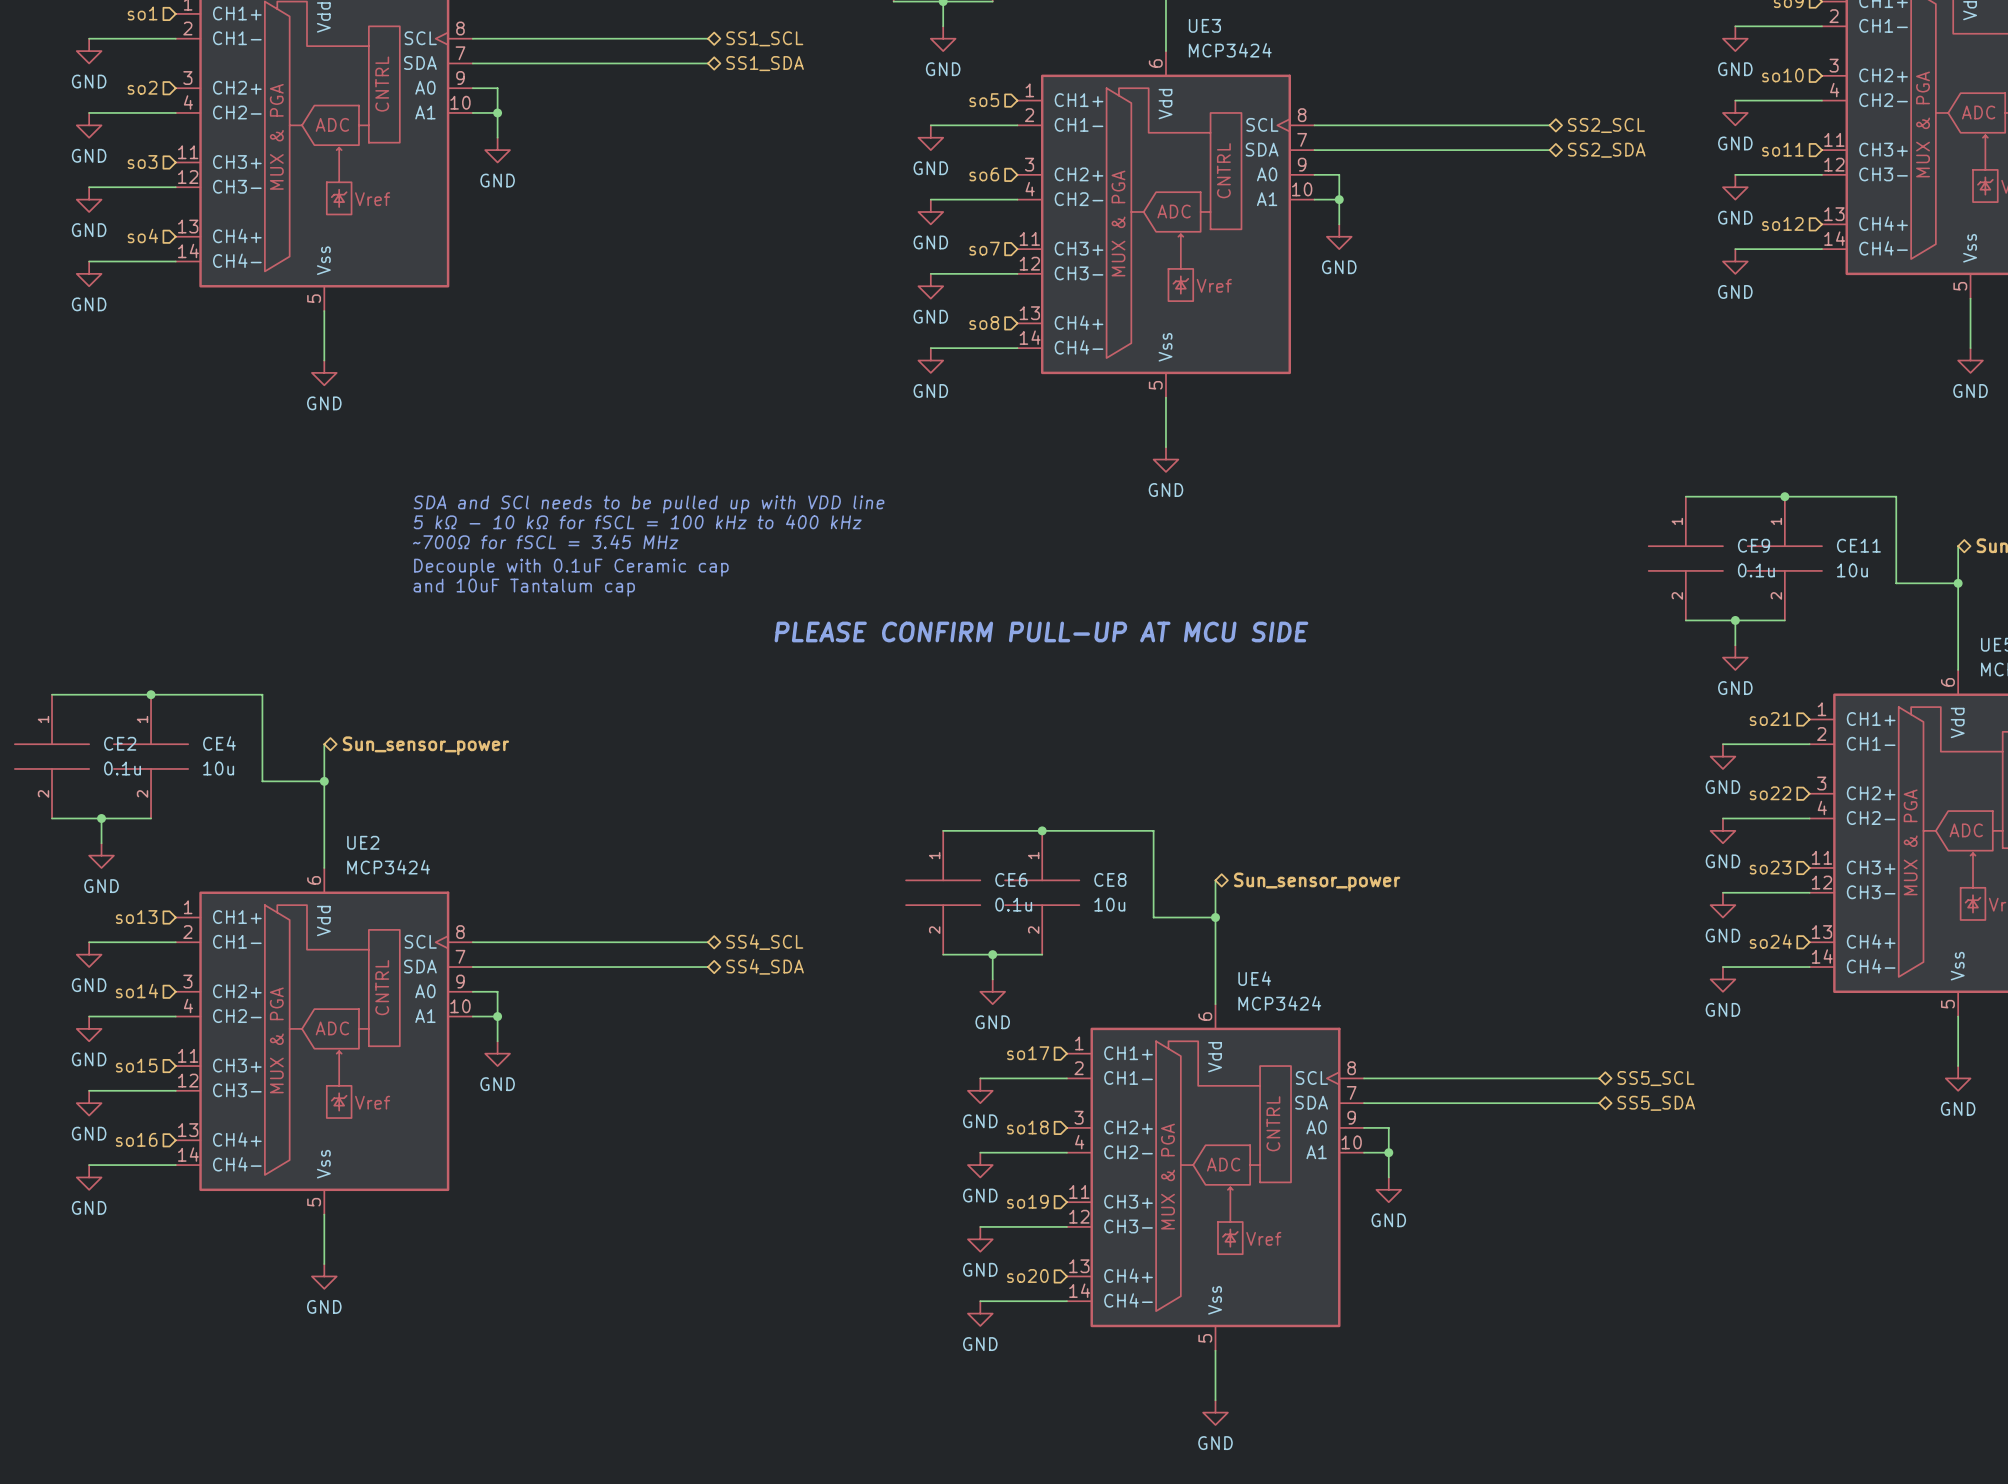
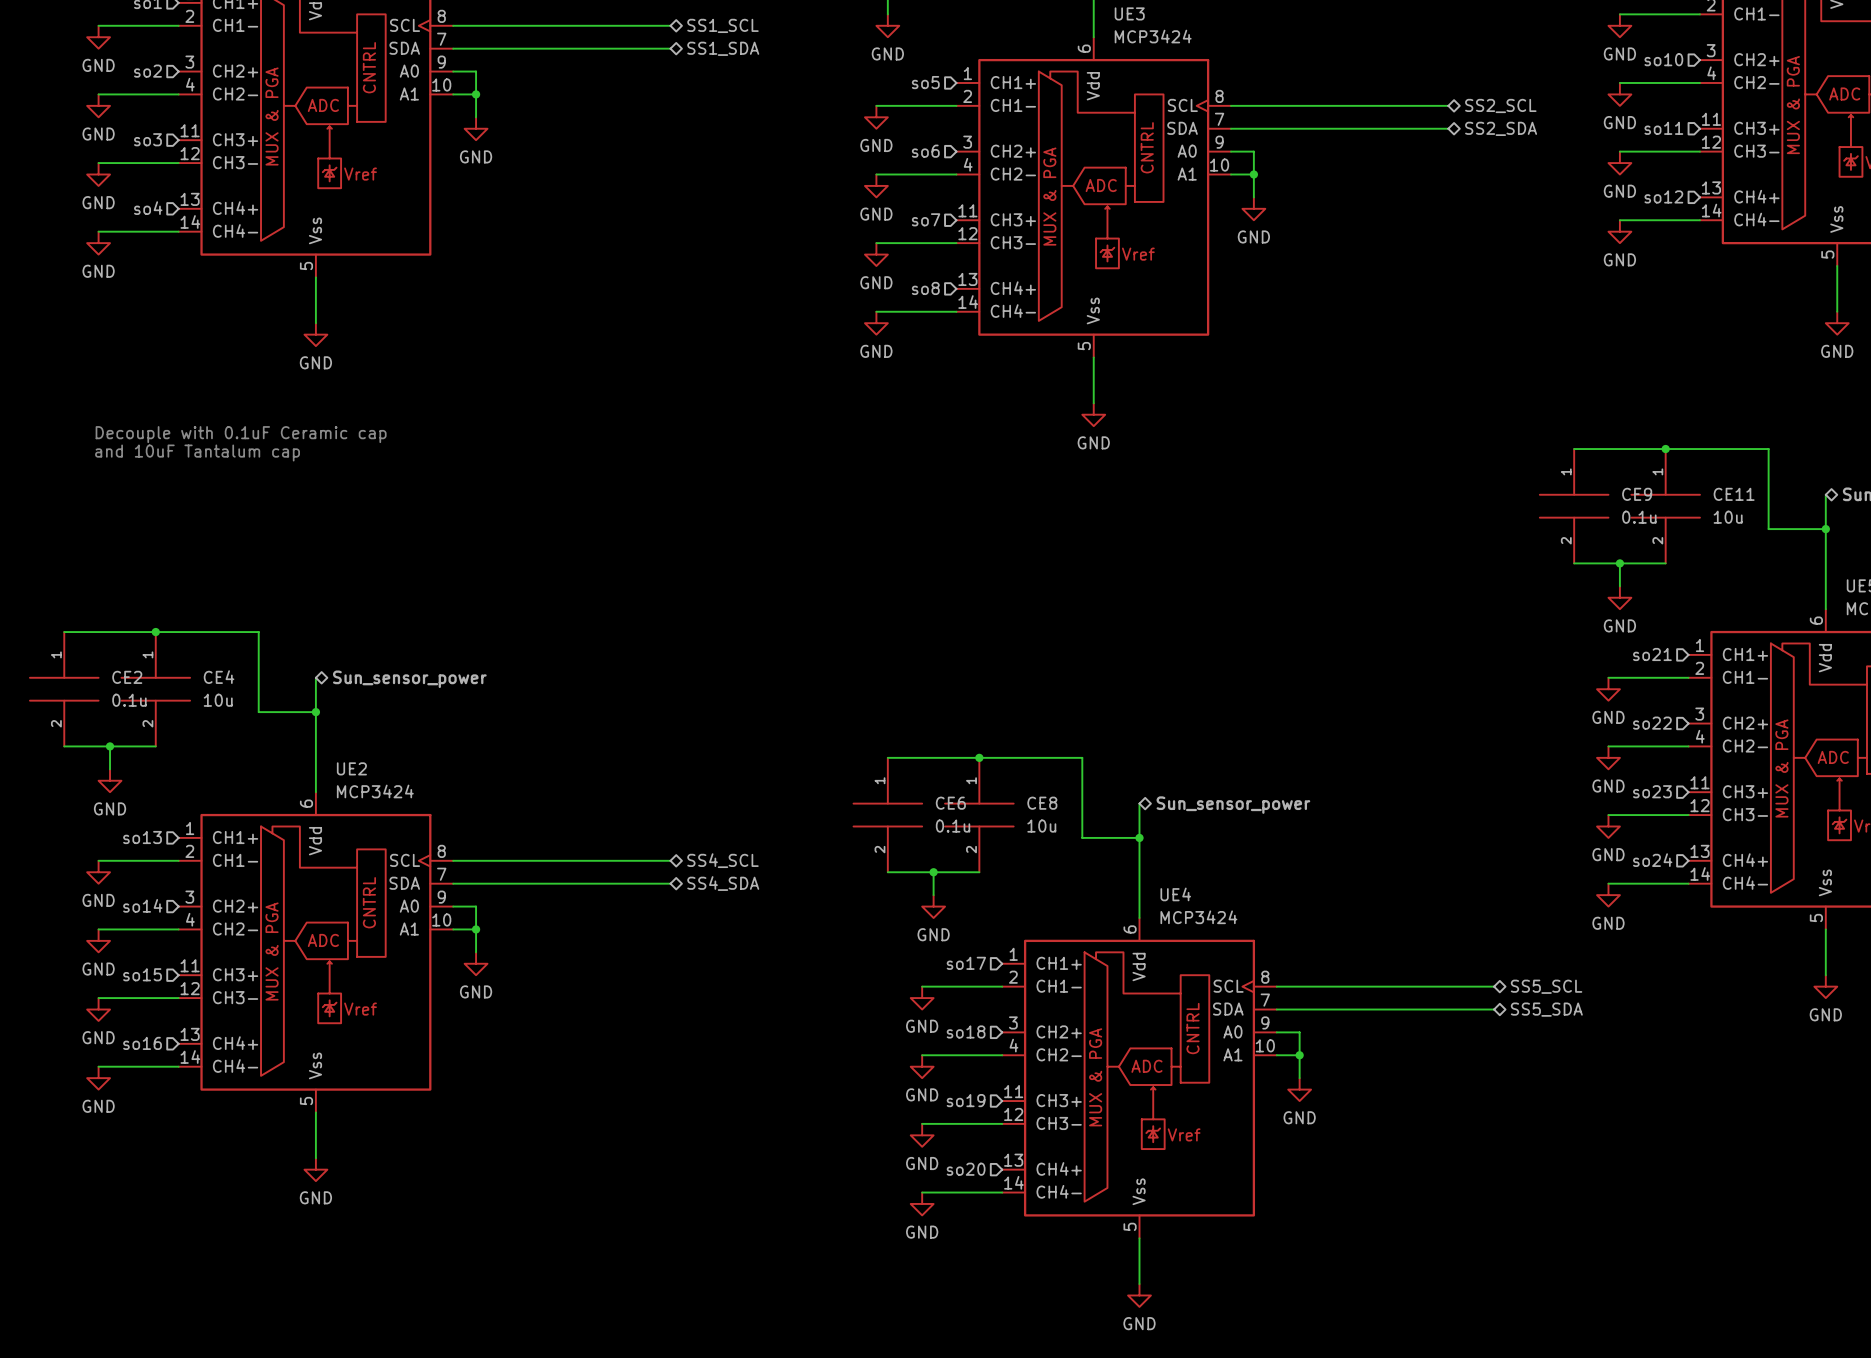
text: none -> Decouple with 0.1uF Ceramic cap (241, 434)
text: none -> and 10uF Tantalum cap (197, 452)
text: SDA and SCl needs to be pulled up with VDD line (649, 504) -> none
text: 5 kΩ - 10 kΩ for fSCL = 100 kHz to 400 kHz (637, 522) -> none
text: ~700Ω for fSCL = 3.45 MHz (545, 541) -> none
text: Decouple with 0.1uF Ceramic cap (571, 567) -> none
text: and 10uF Tantalum cap (524, 587) -> none
text: PLEASE CONFIRM PULL-UP AT MCU SIDE (1041, 631) -> none

